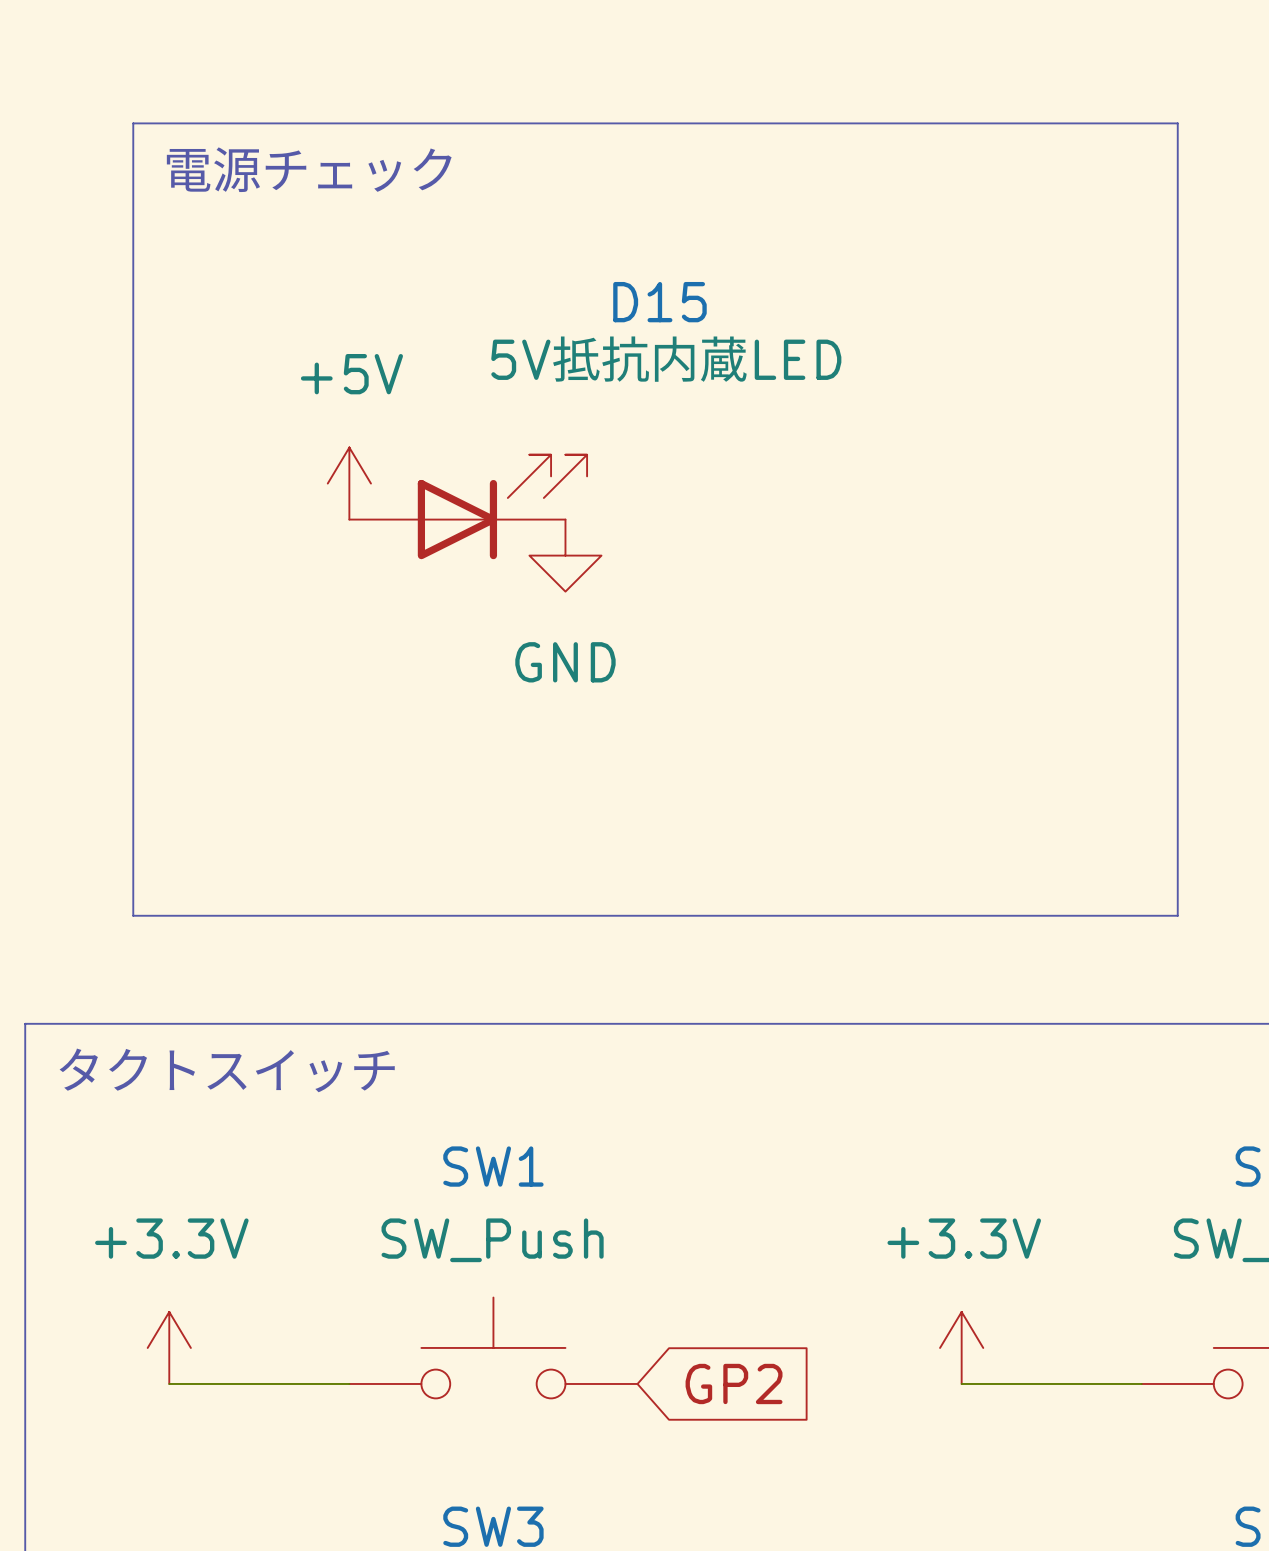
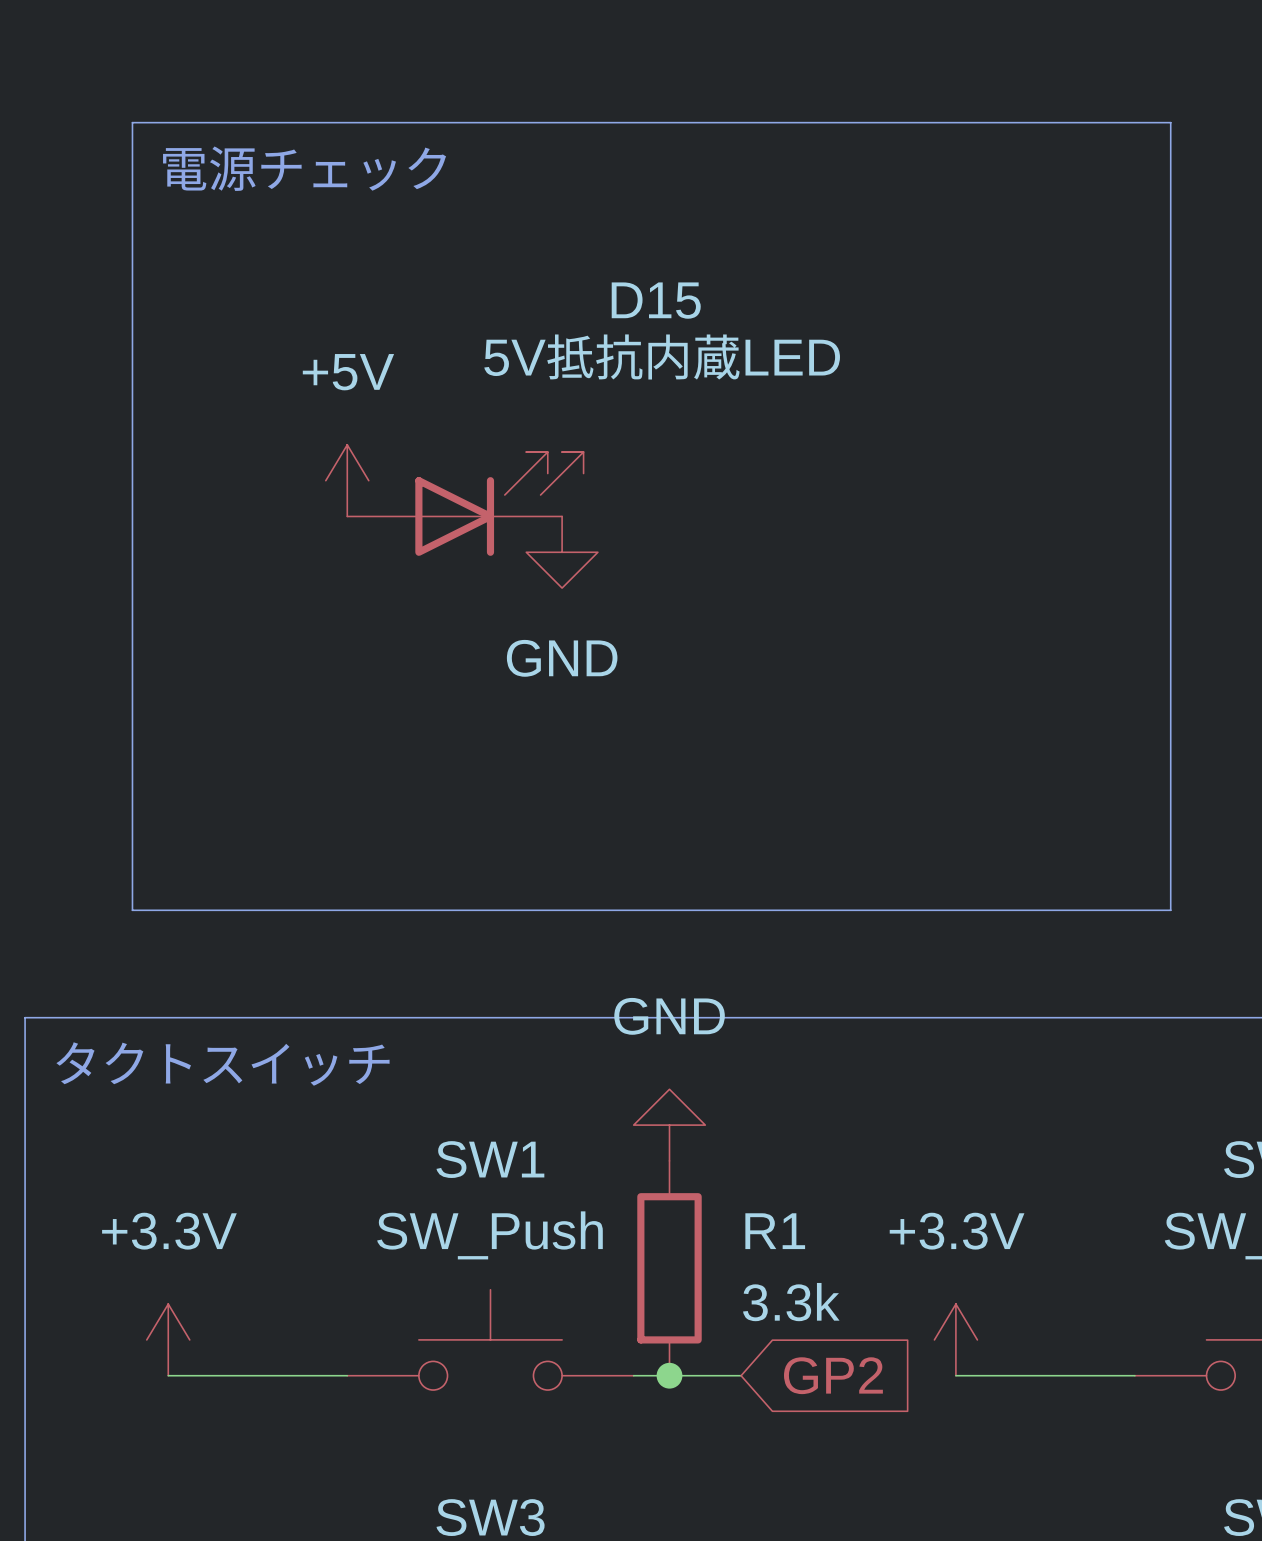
power symbol: none -> GND (669, 1125)
R1: none -> 3.3k (669, 1268)
wire: none -> (633, 1375) (741, 1375)
junction: none -> (669, 1375)
global label position: GP2 (734, 1383) -> GP2 (833, 1375)

